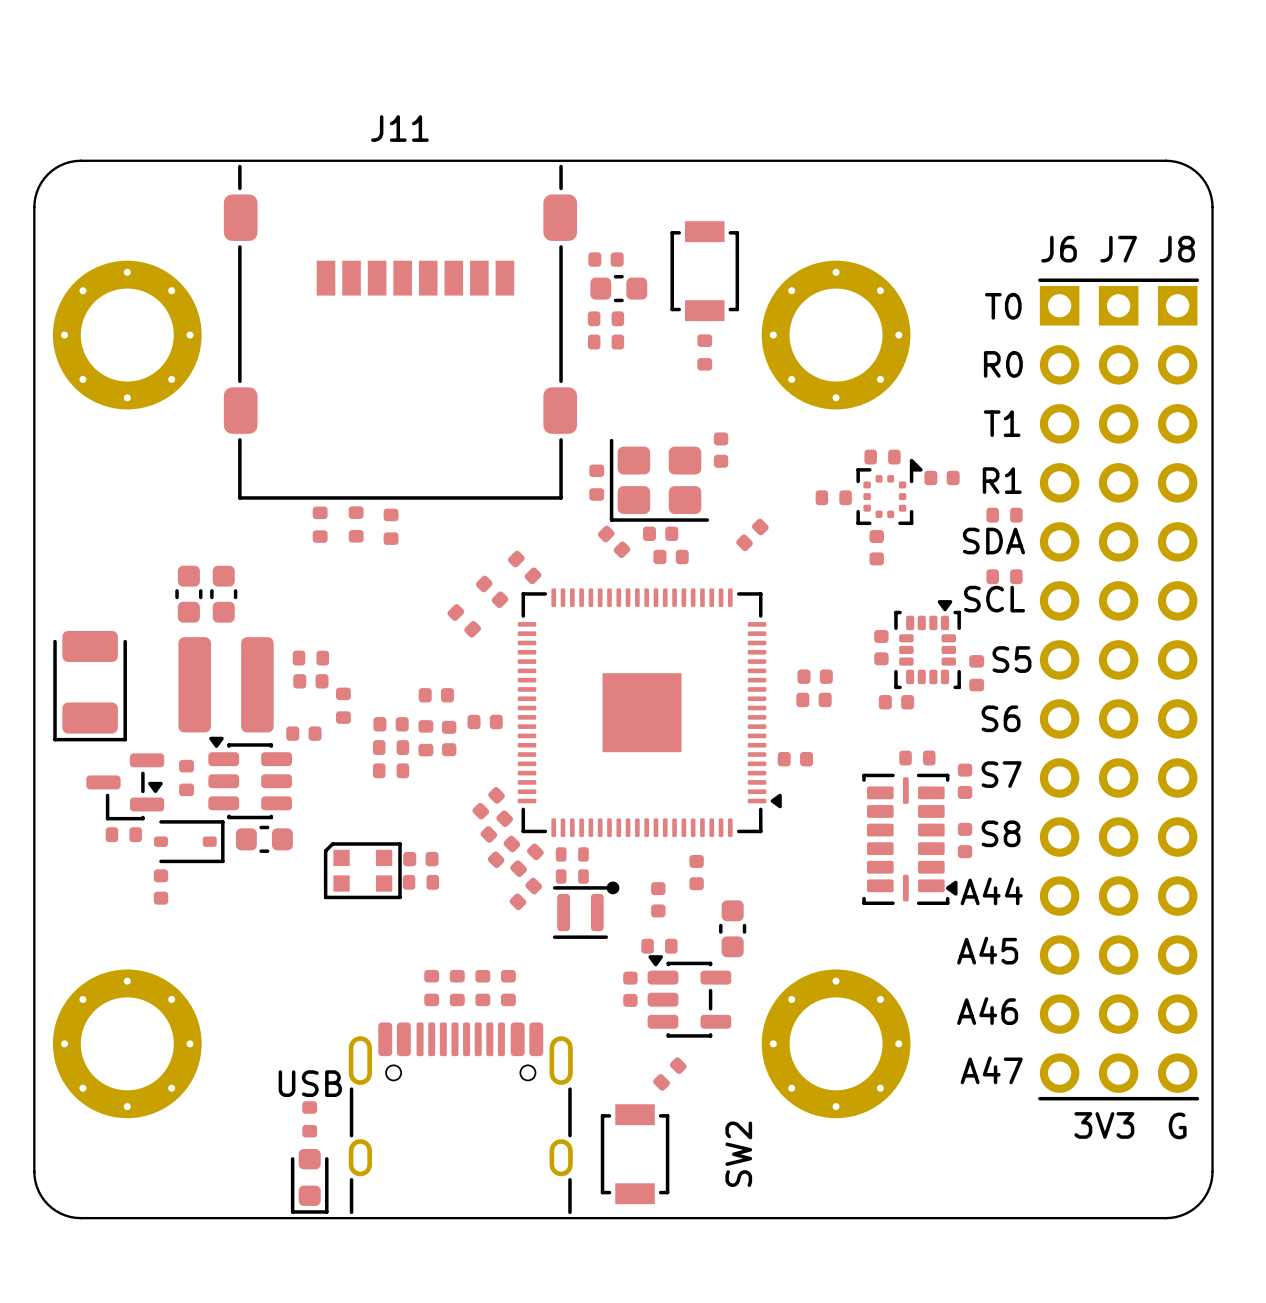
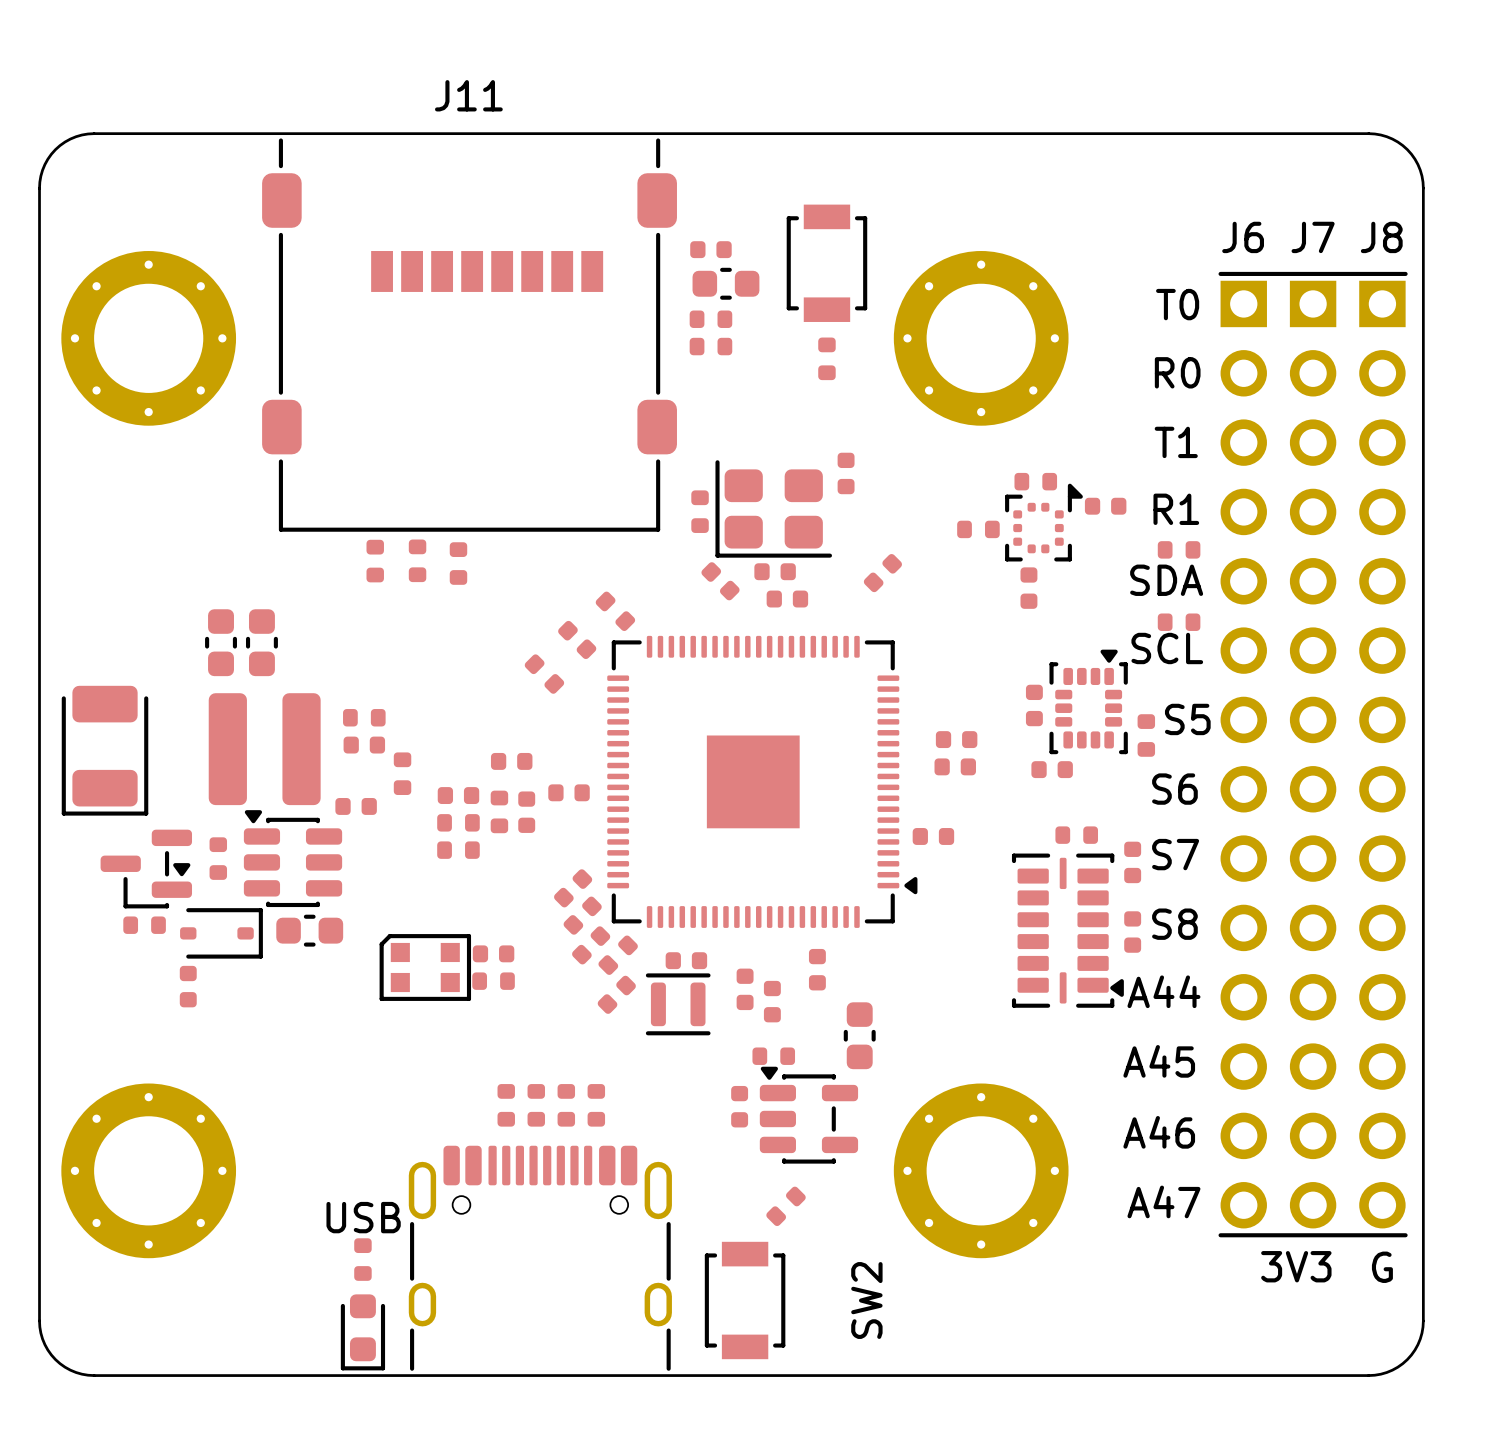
part: (572, 854) -> none
part: none -> (686, 960)
part: (572, 876) -> none
part footprint: [552, 881, 620, 939] -> [645, 973, 711, 1036]
part: none -> (745, 989)

